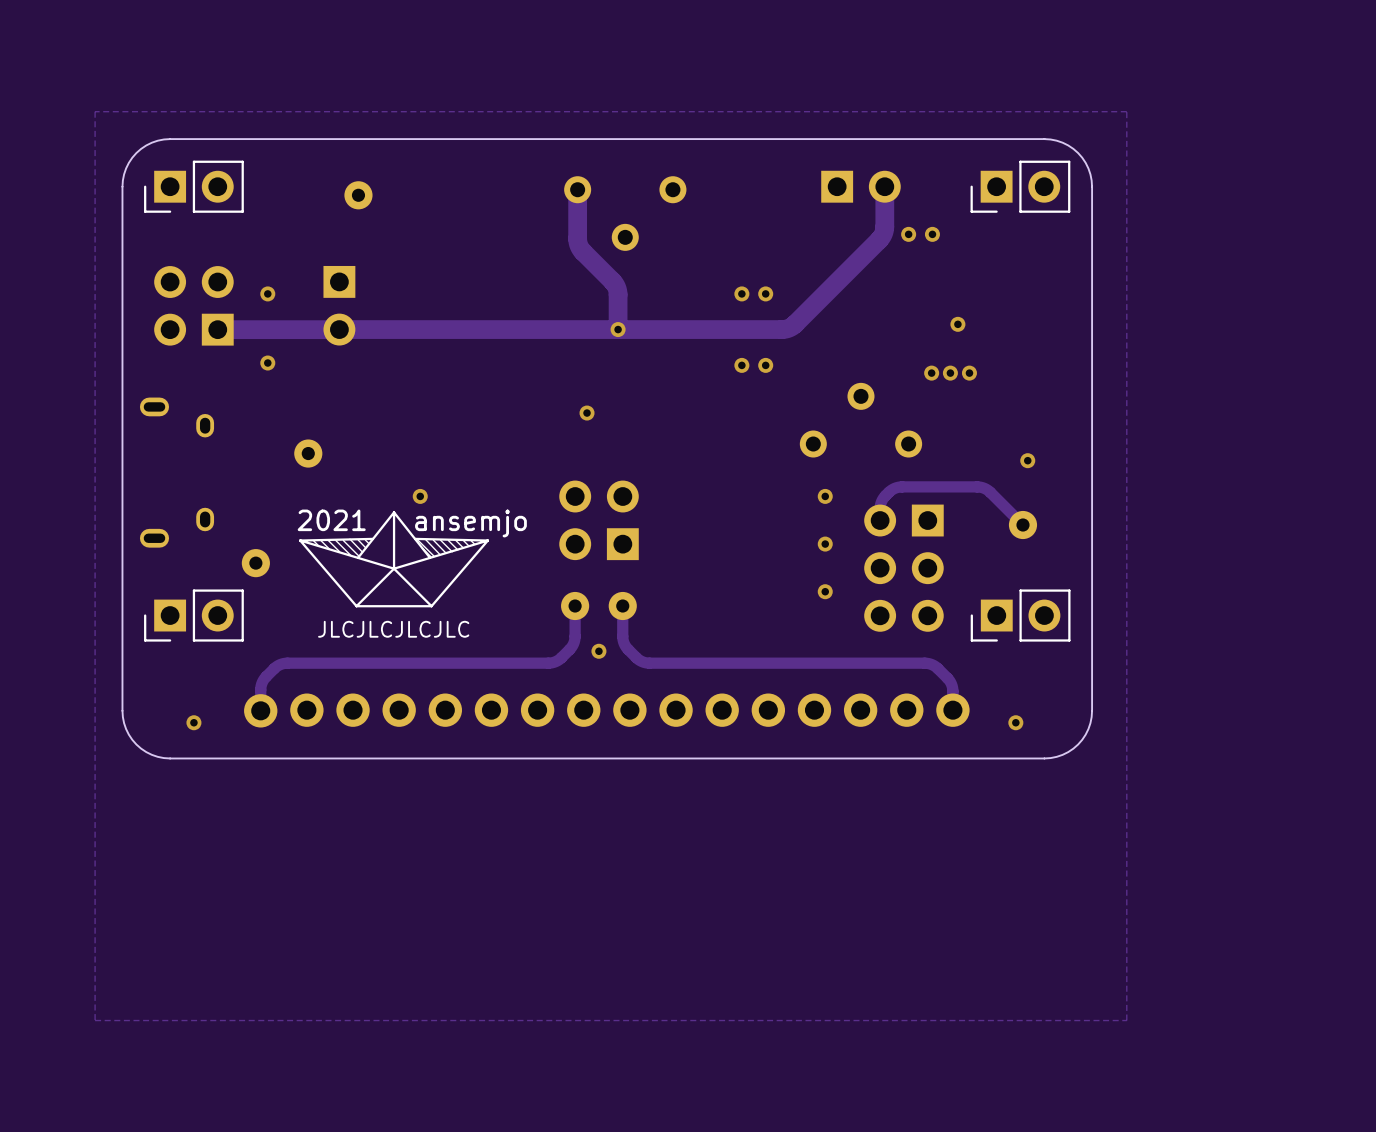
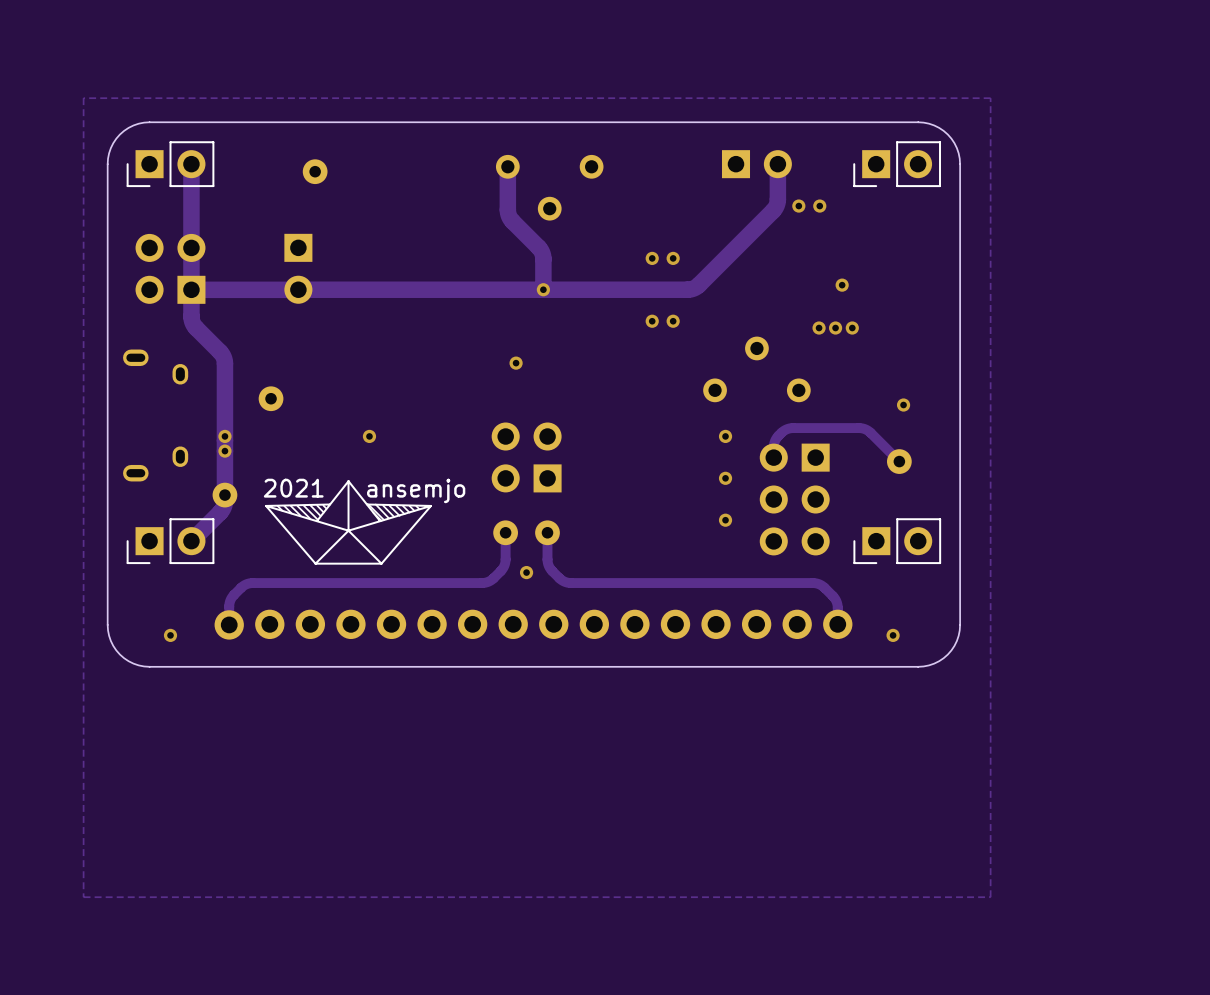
track: none -> (191, 164) (191, 319) (195, 326) (221, 353) (224, 363) (224, 504) (221, 511) (191, 541)
via: (267, 293) -> none
via: (267, 363) -> none
via: none -> (224, 436)
via: none -> (224, 451)
drawing position: (394, 559) -> (348, 522)
text: JLCJLCJLCJLC (393, 629) -> none

